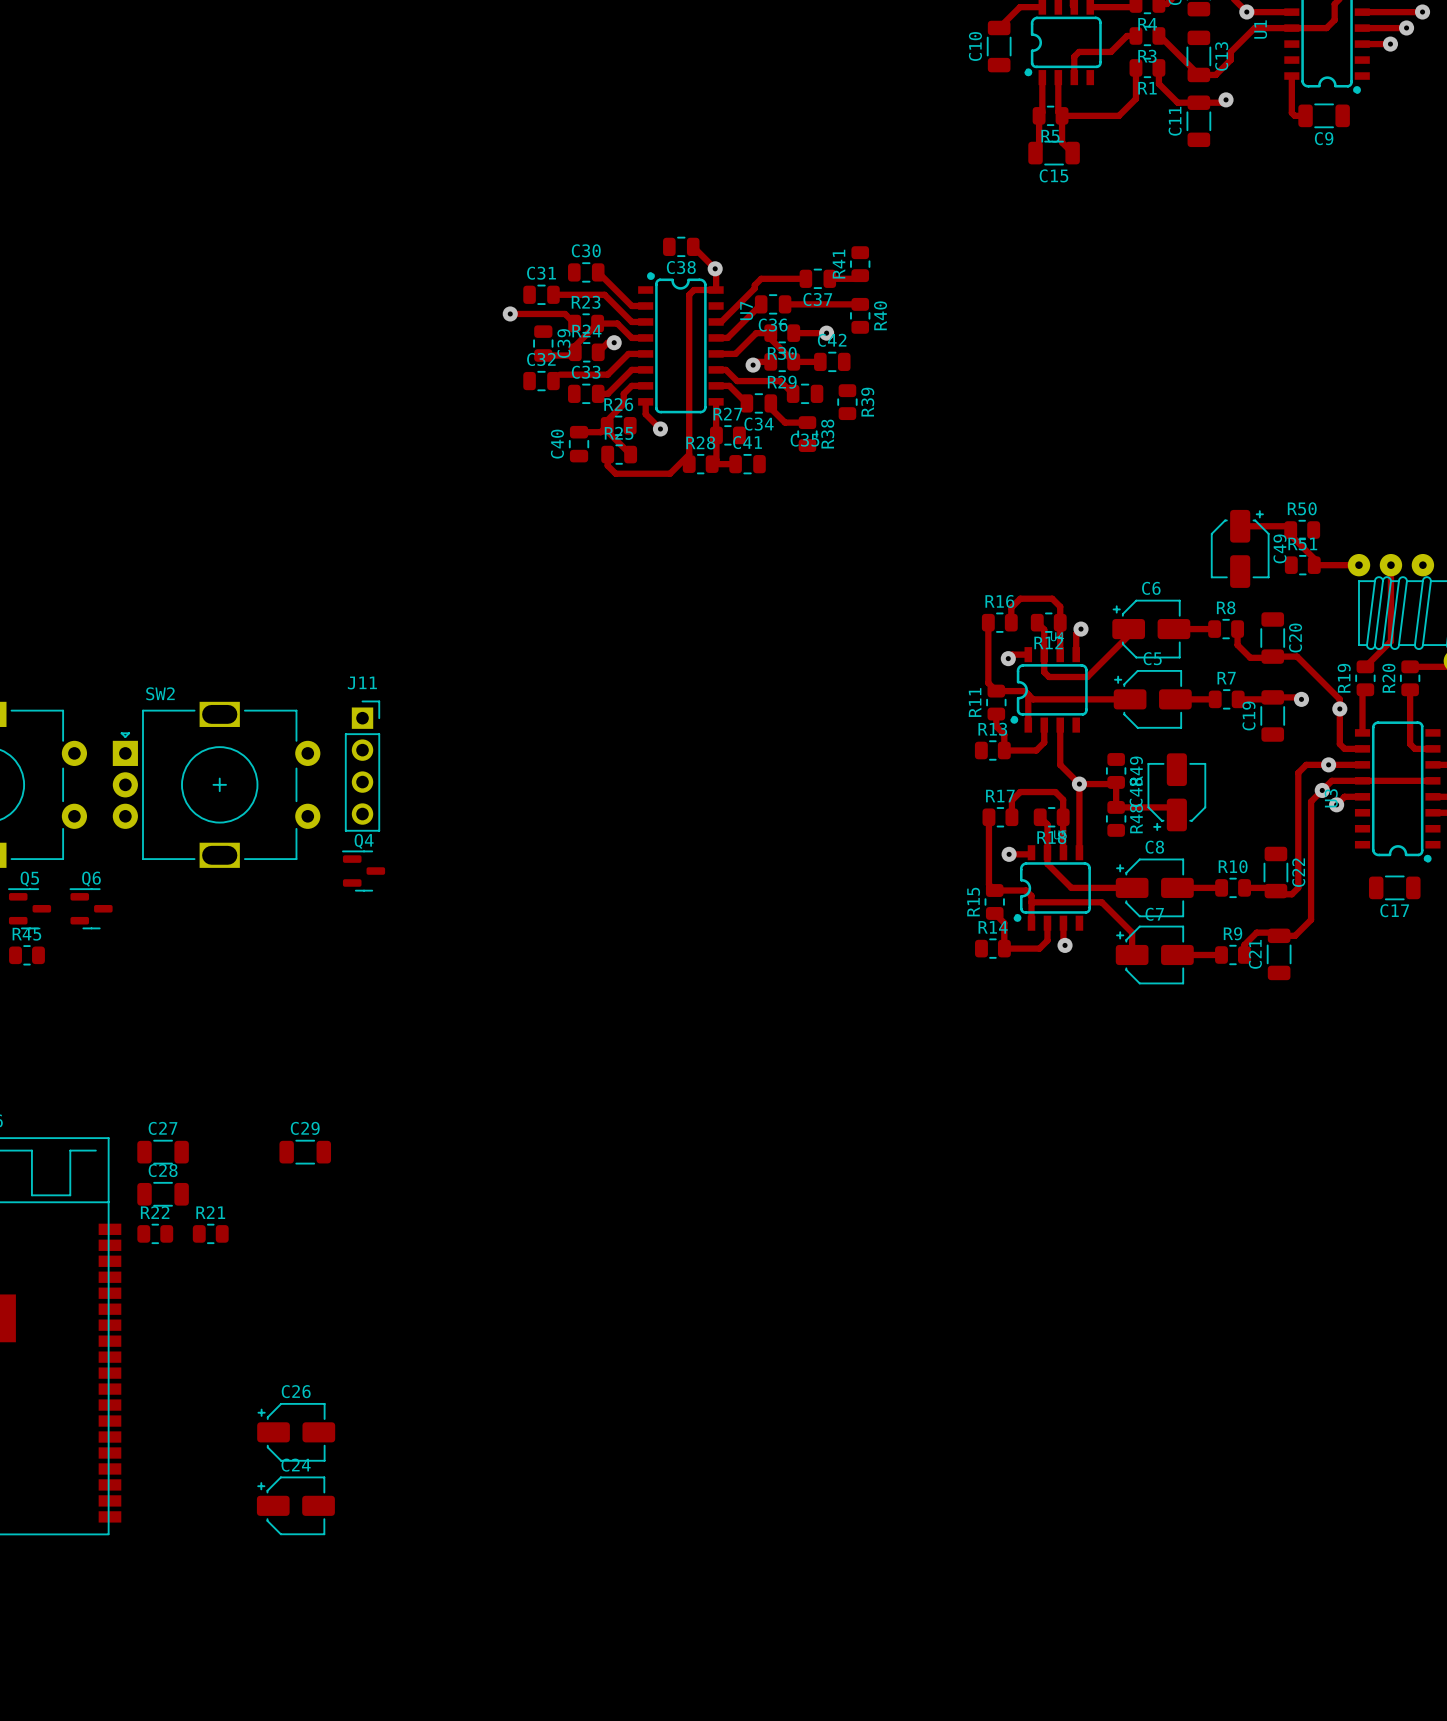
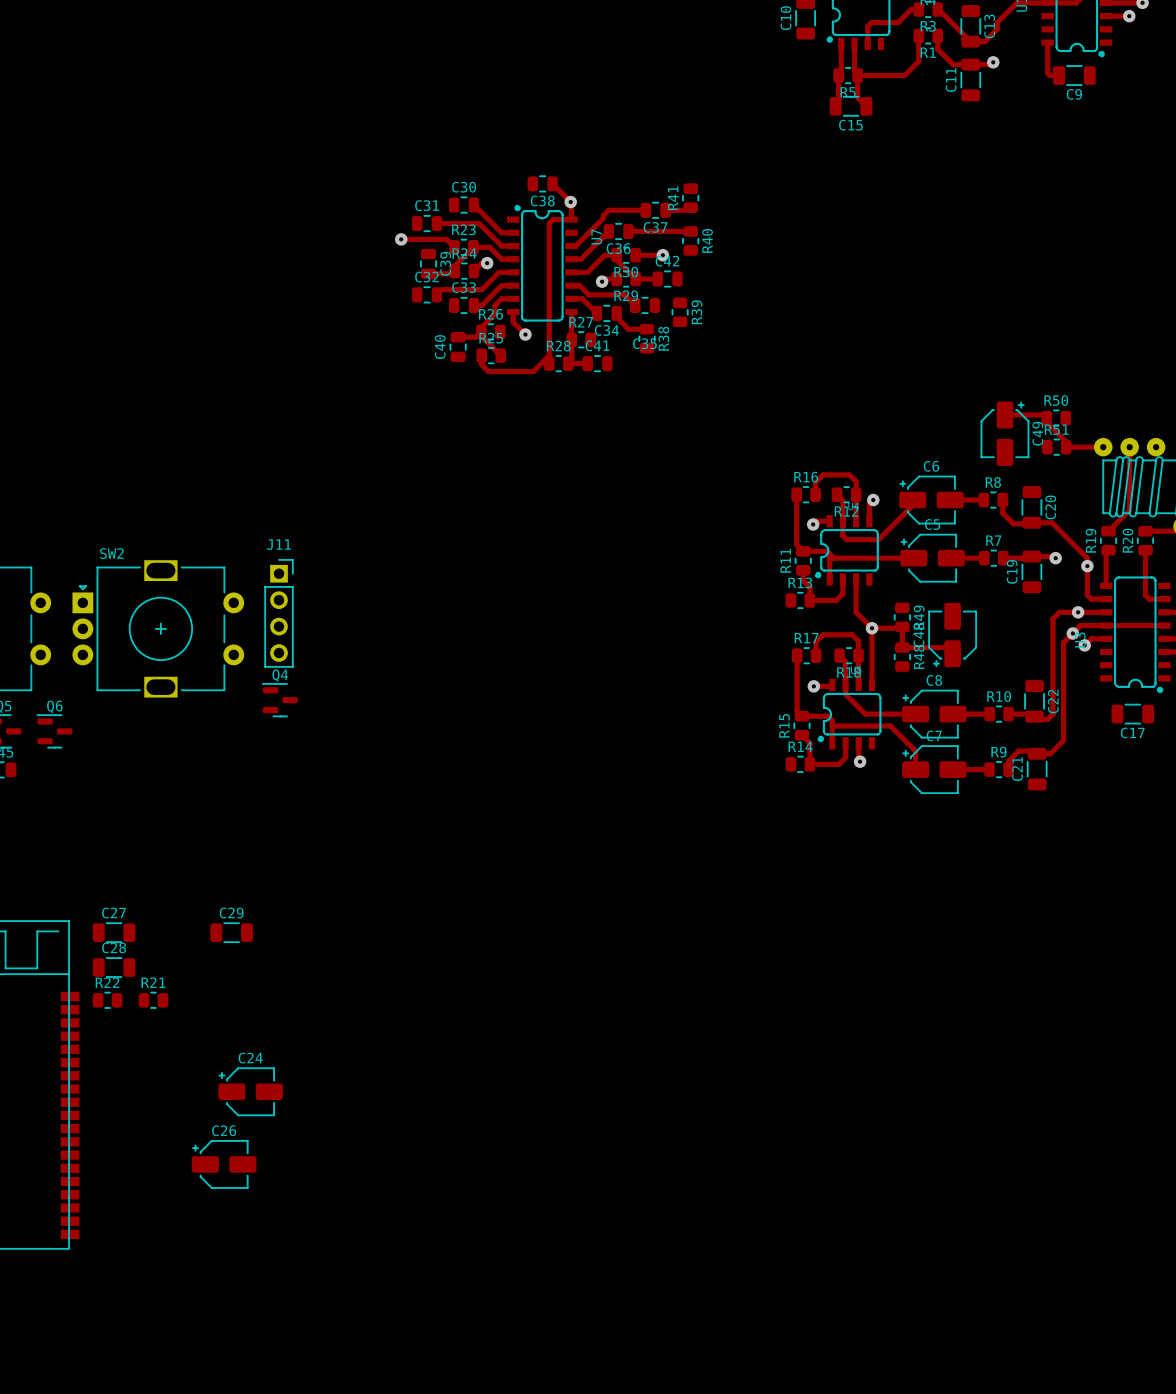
C24 position: (295, 1505) -> (250, 1091)

